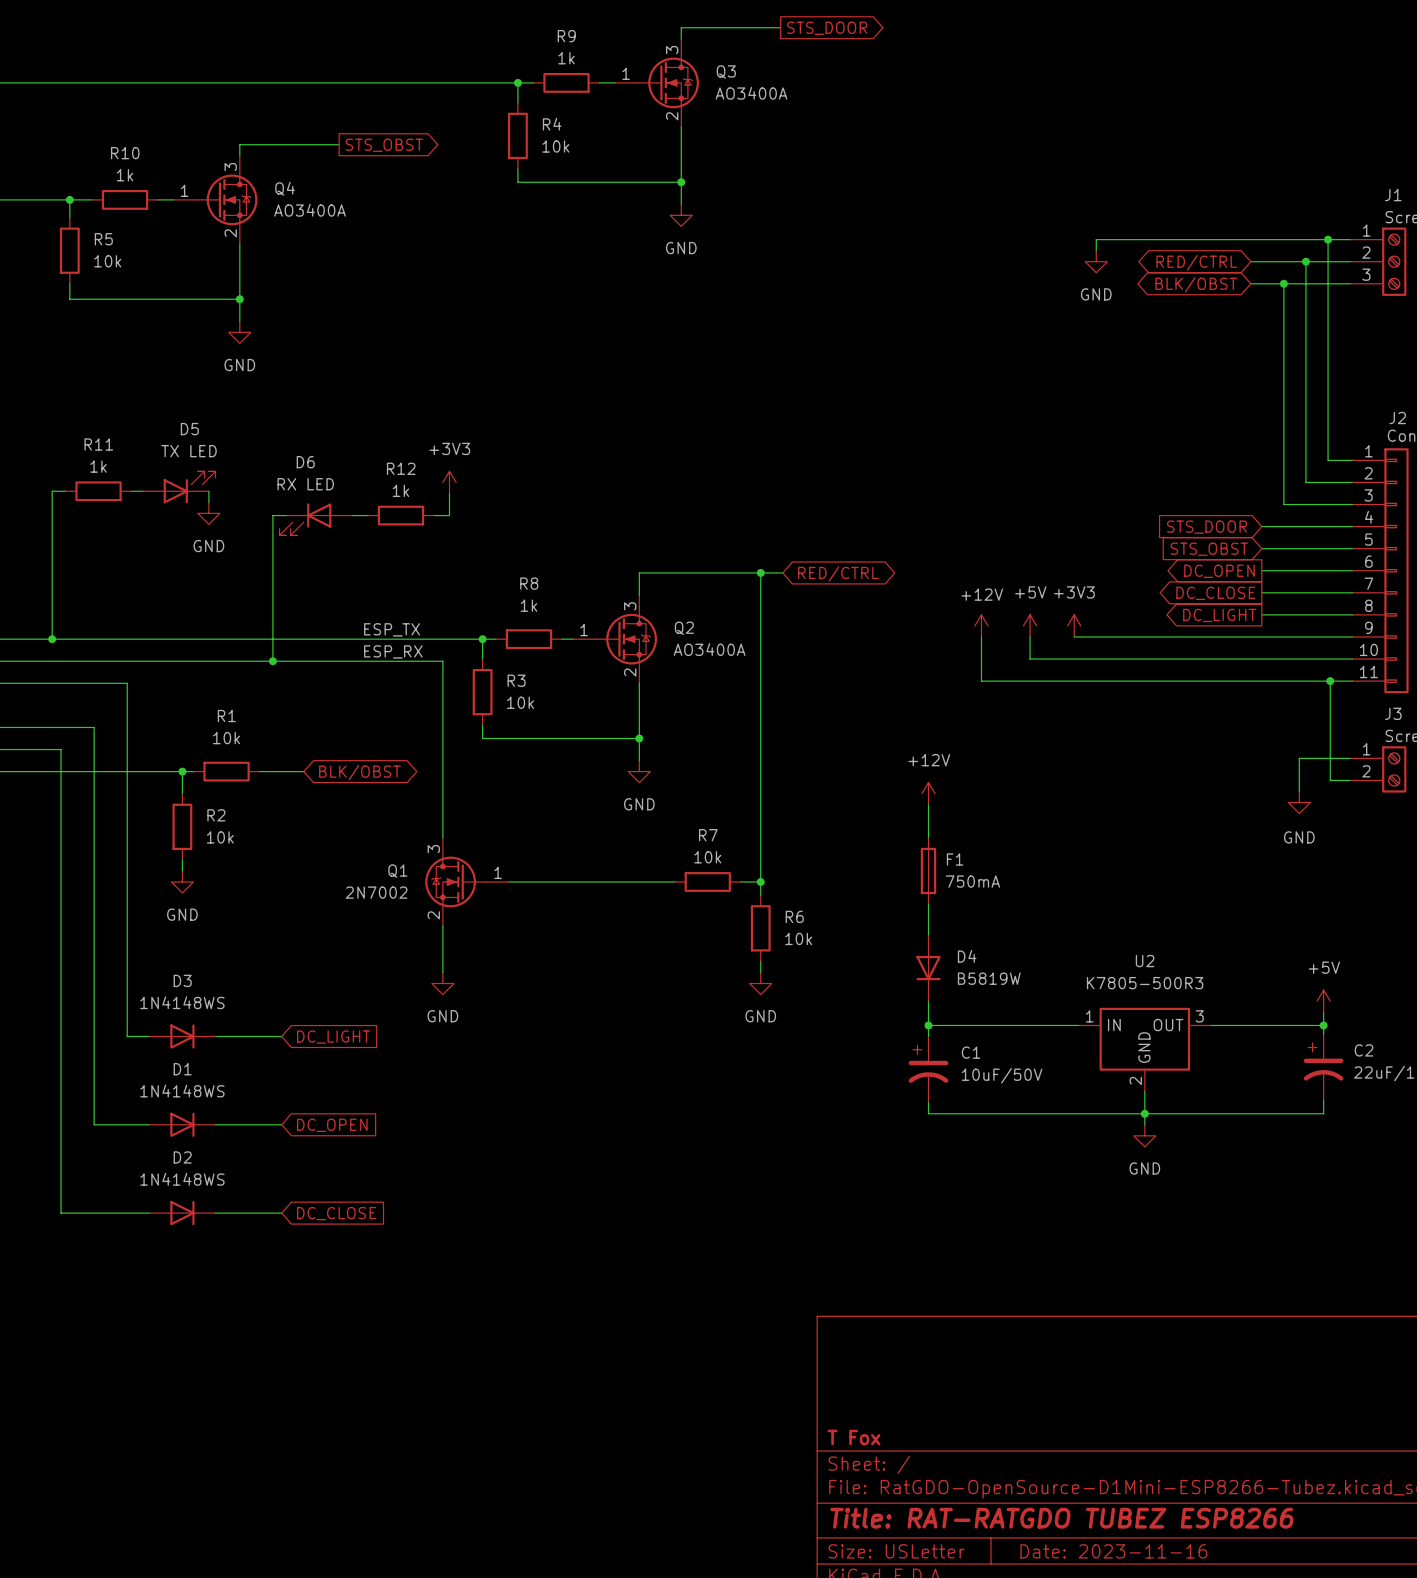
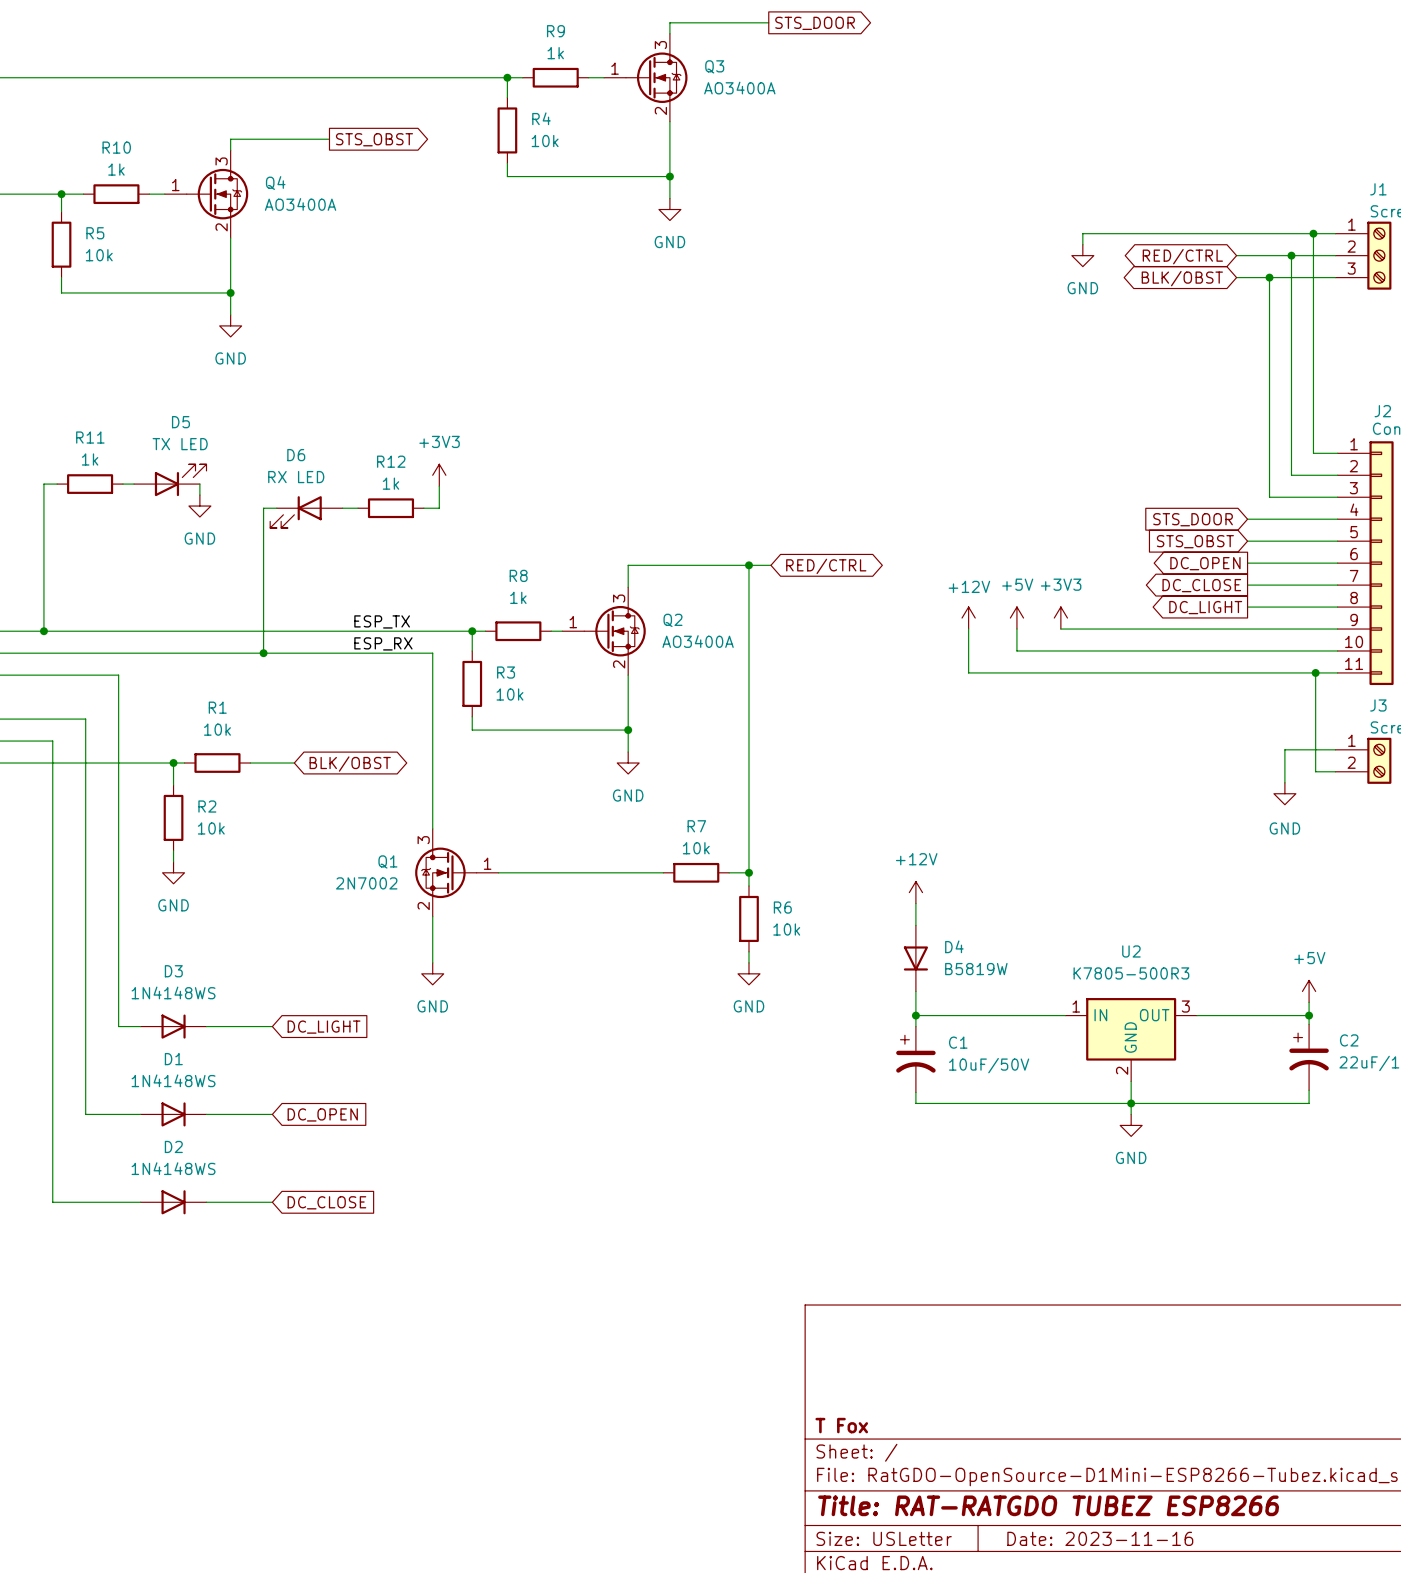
power symbol position: +12V (928, 793) -> +12V (915, 892)
wire: (928, 804) (928, 837) -> none
F1: 750mA (928, 870) -> none

